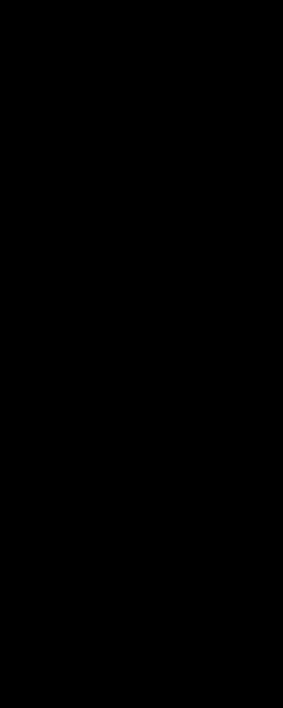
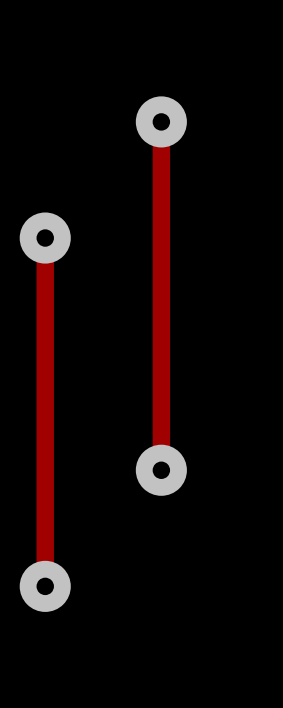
track: none -> (161, 121) (161, 470)
via: none -> (161, 121)
track: none -> (45, 238) (45, 586)
via: none -> (45, 238)
via: none -> (161, 470)
via: none -> (45, 586)

